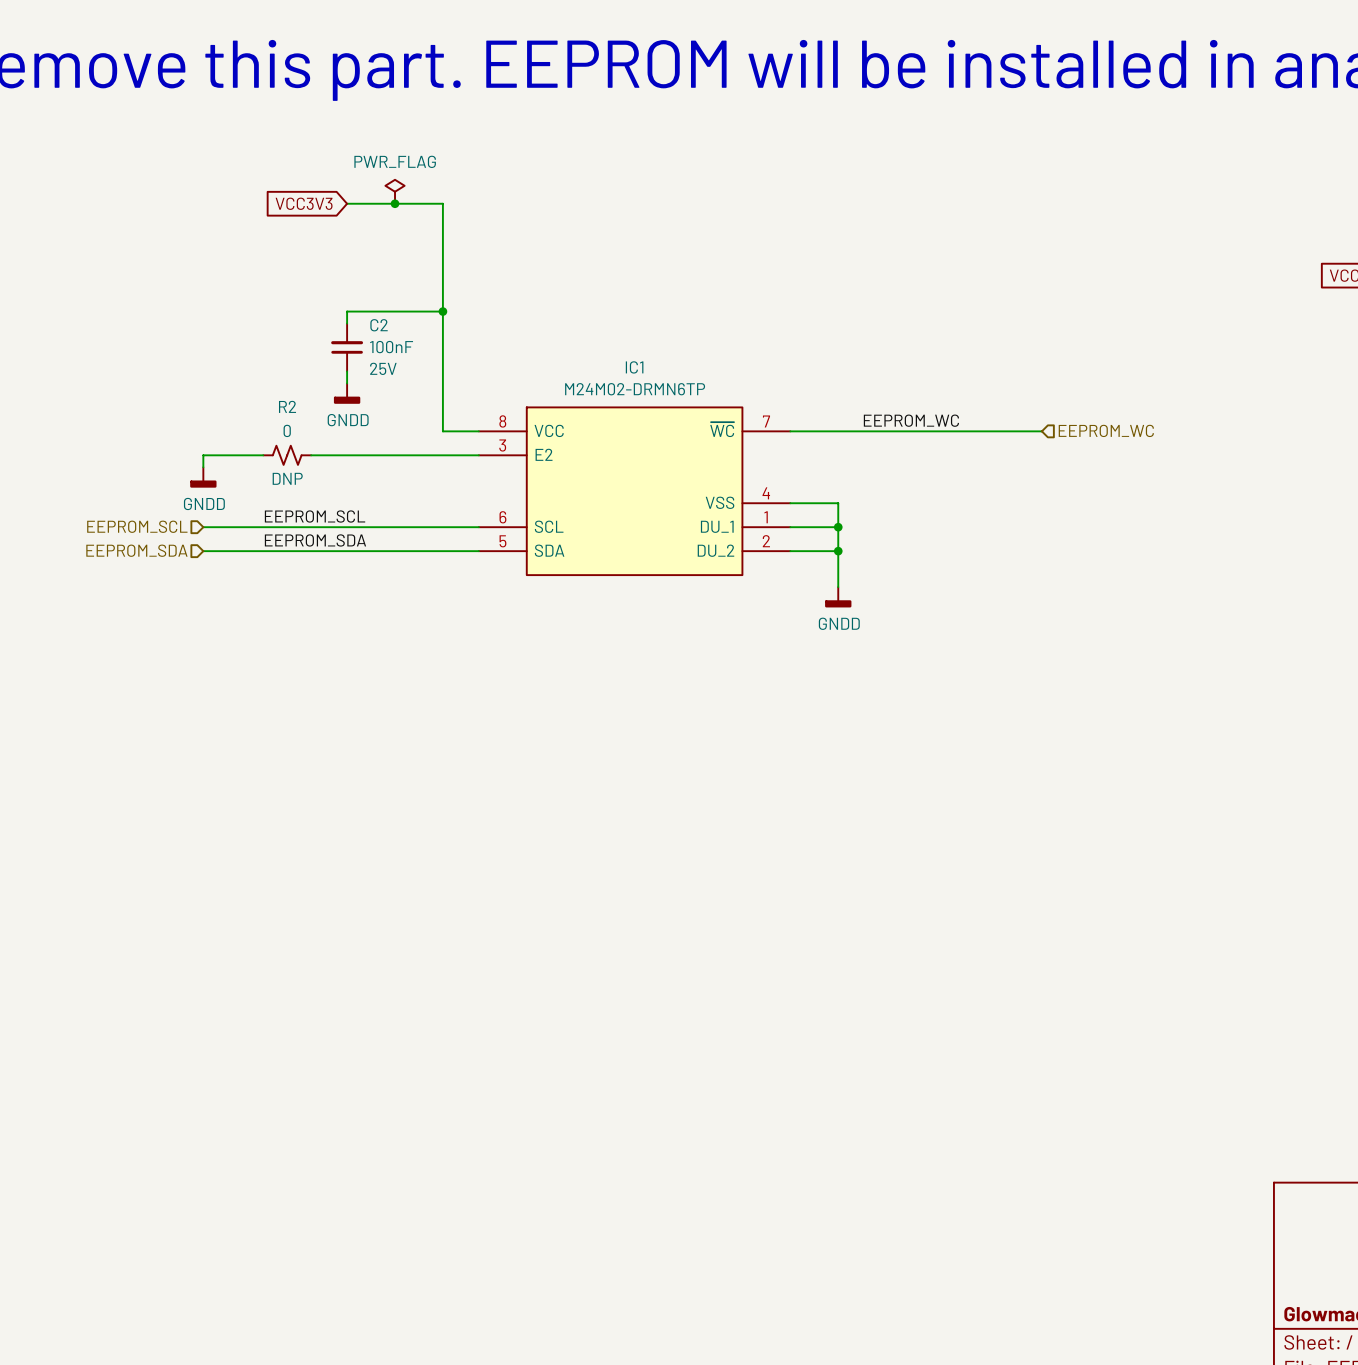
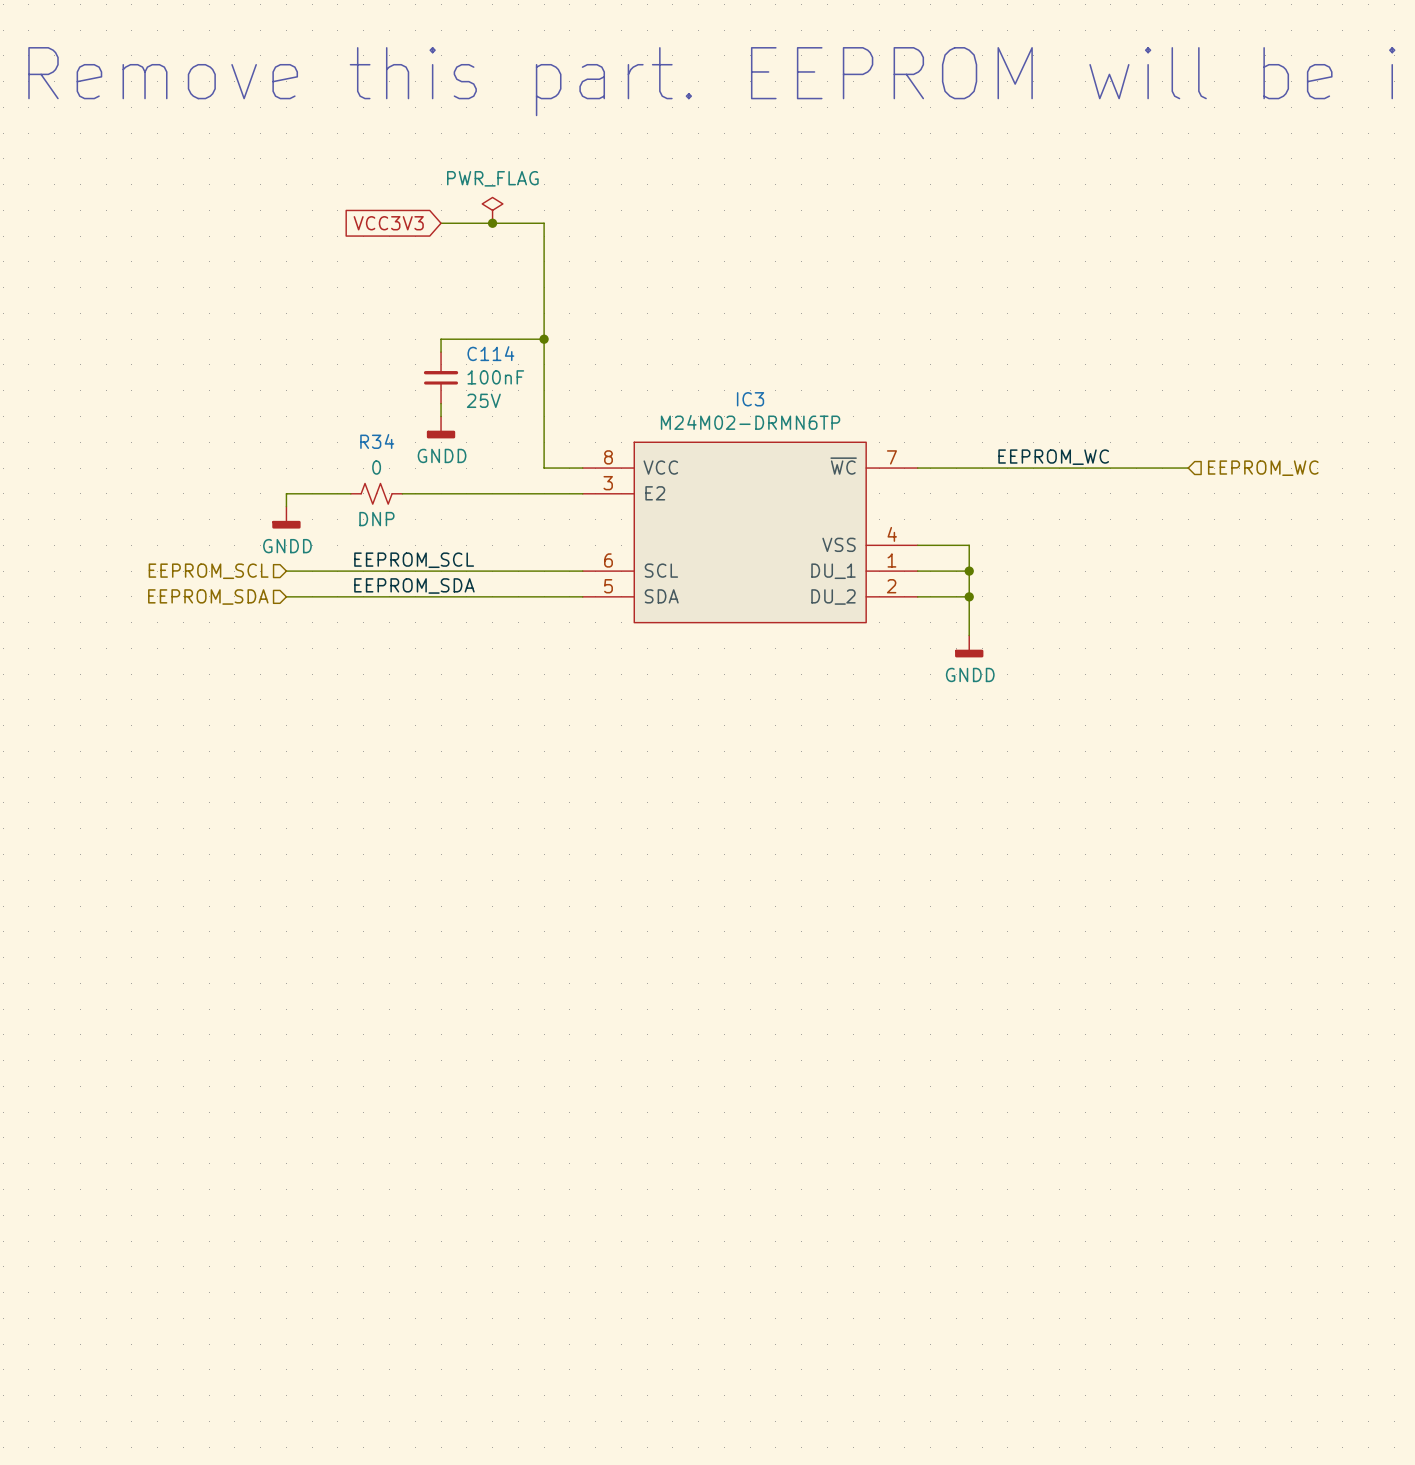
C2 name: C2 (379, 325) -> C114 (490, 353)
IC1 name: IC1 (634, 367) -> IC3 (750, 399)
R2 name: R2 (287, 406) -> R34 (377, 441)

